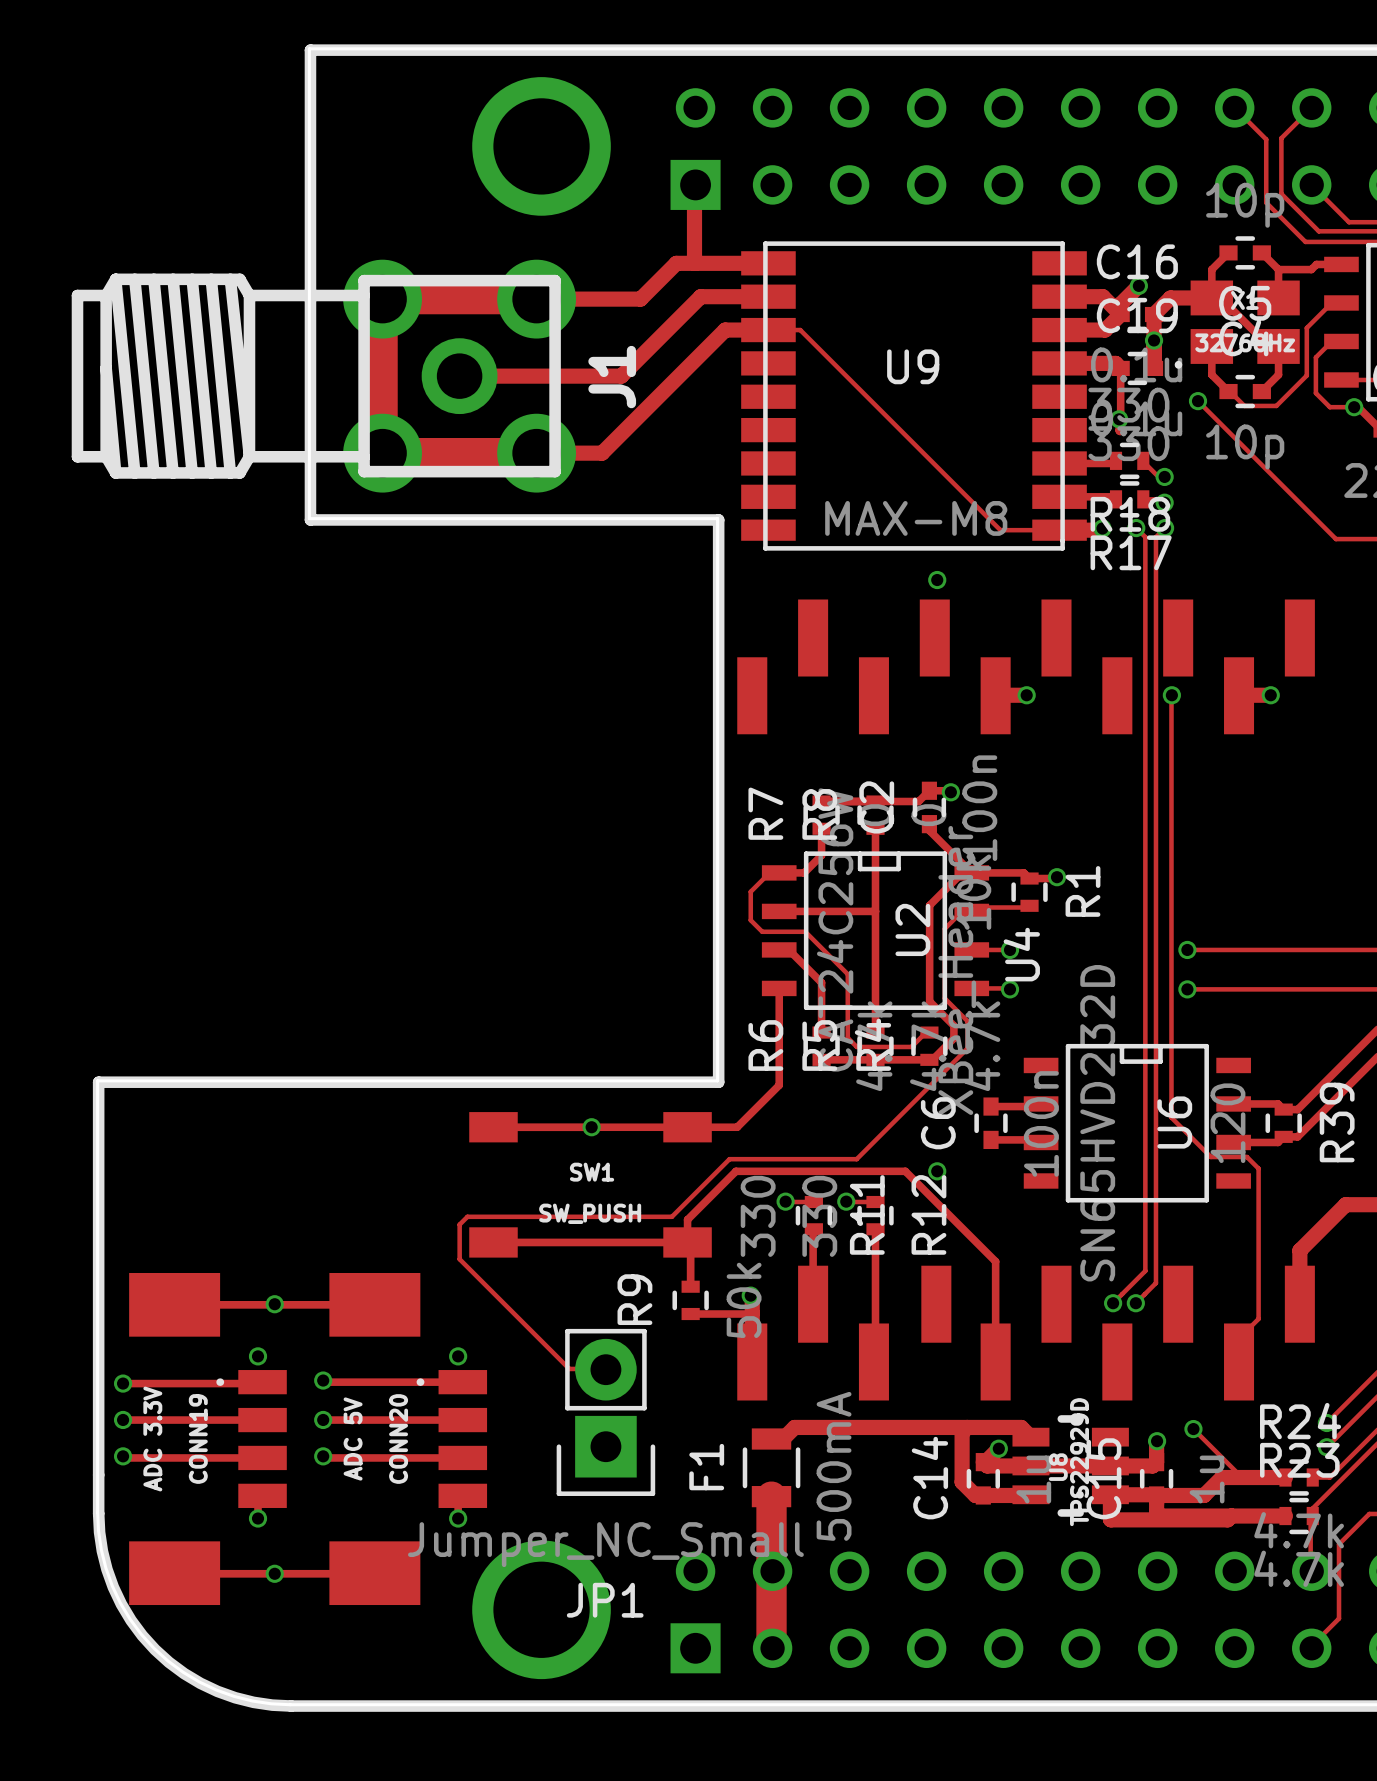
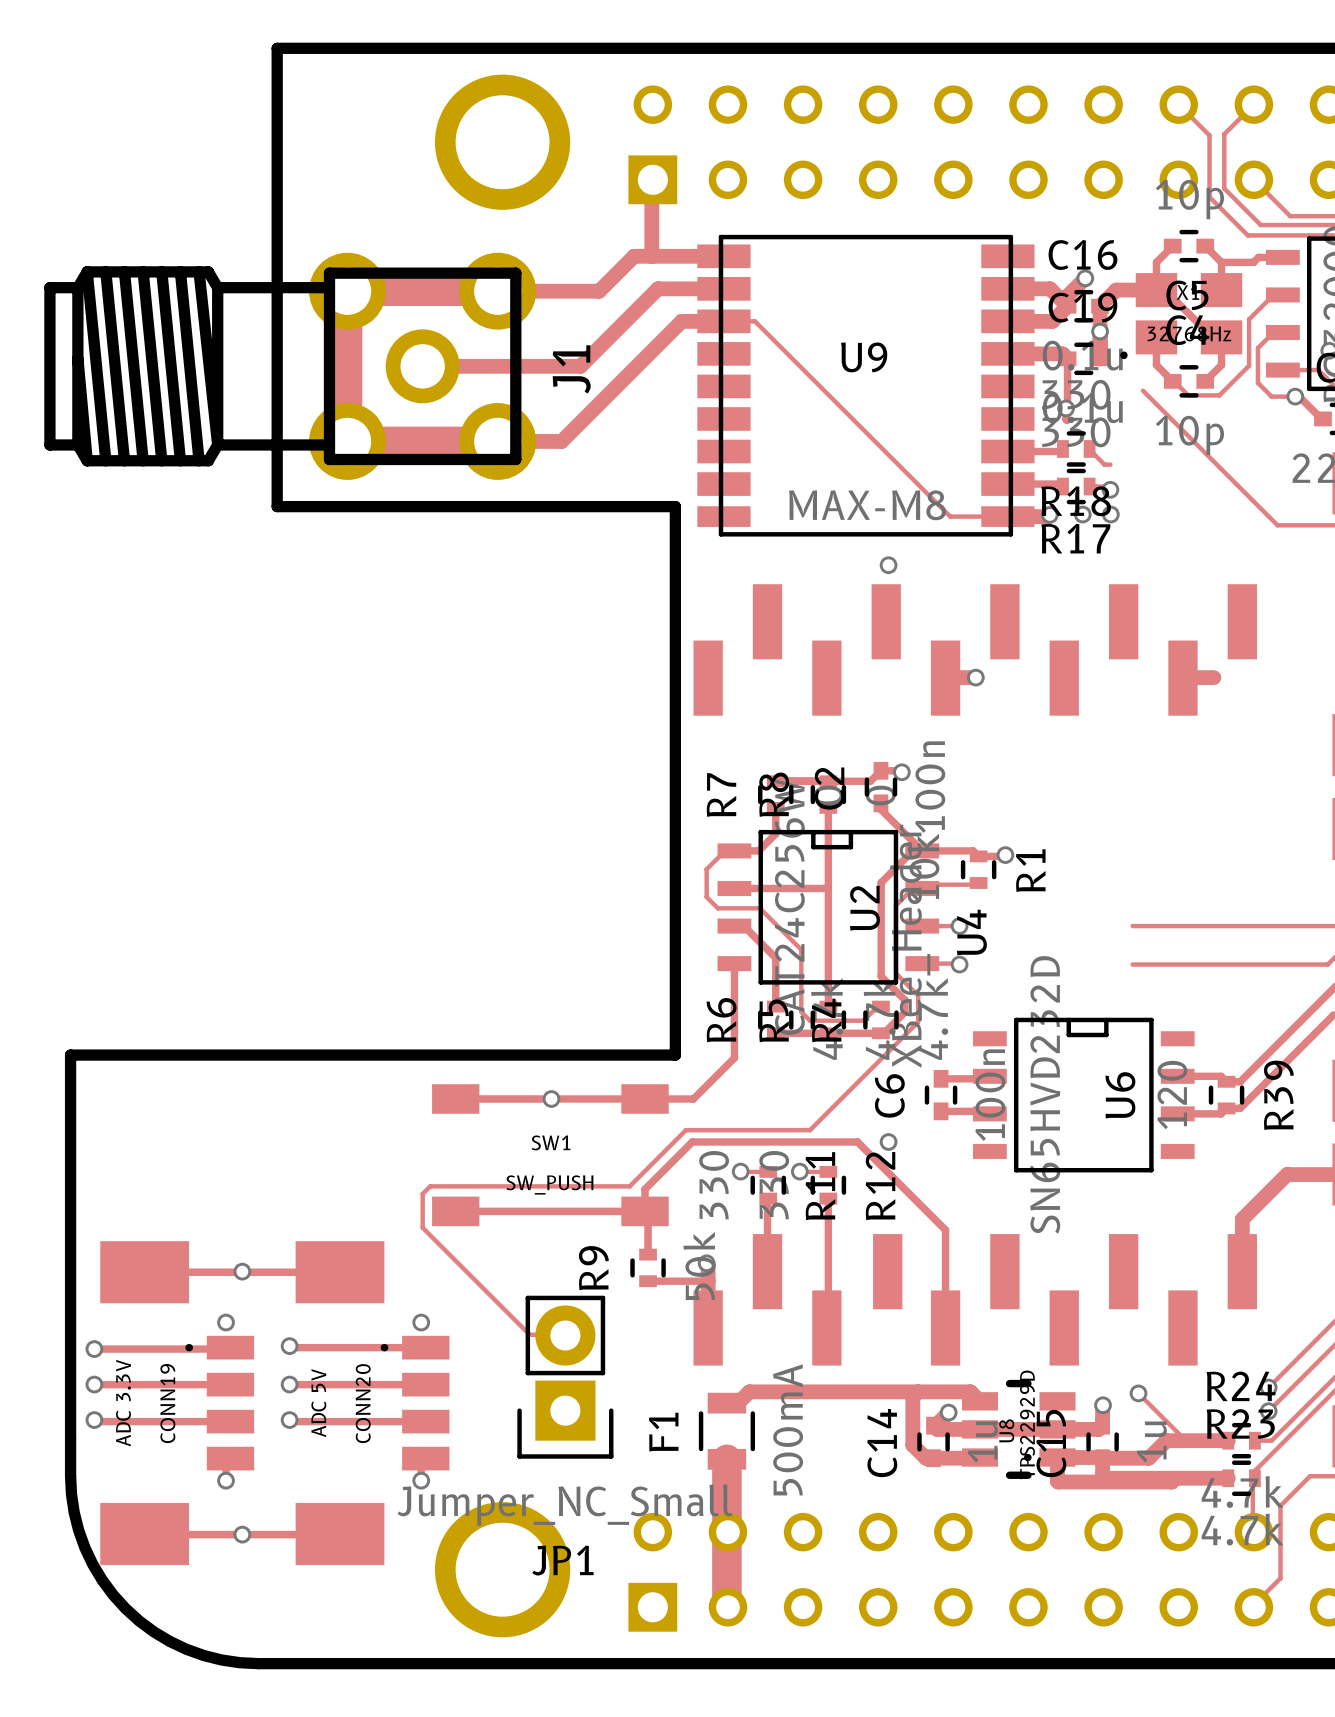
via: (1198, 401) -> none
via: (1164, 476) -> none
track: (1136, 528) (1145, 537) (1145, 1270) (1113, 1303) -> none
track: (1165, 528) (1155, 537) (1155, 1283) (1135, 1303) -> none
track: (1171, 695) (1171, 1117) (1210, 1157) (1246, 1157) (1258, 1168) (1258, 1318) (1239, 1338) (1239, 1361) -> none
via: (1171, 695) -> none
via: (1270, 695) -> none
via: (1187, 949) -> none
via: (1187, 989) -> none
via: (1113, 1303) -> none
via: (1135, 1303) -> none

